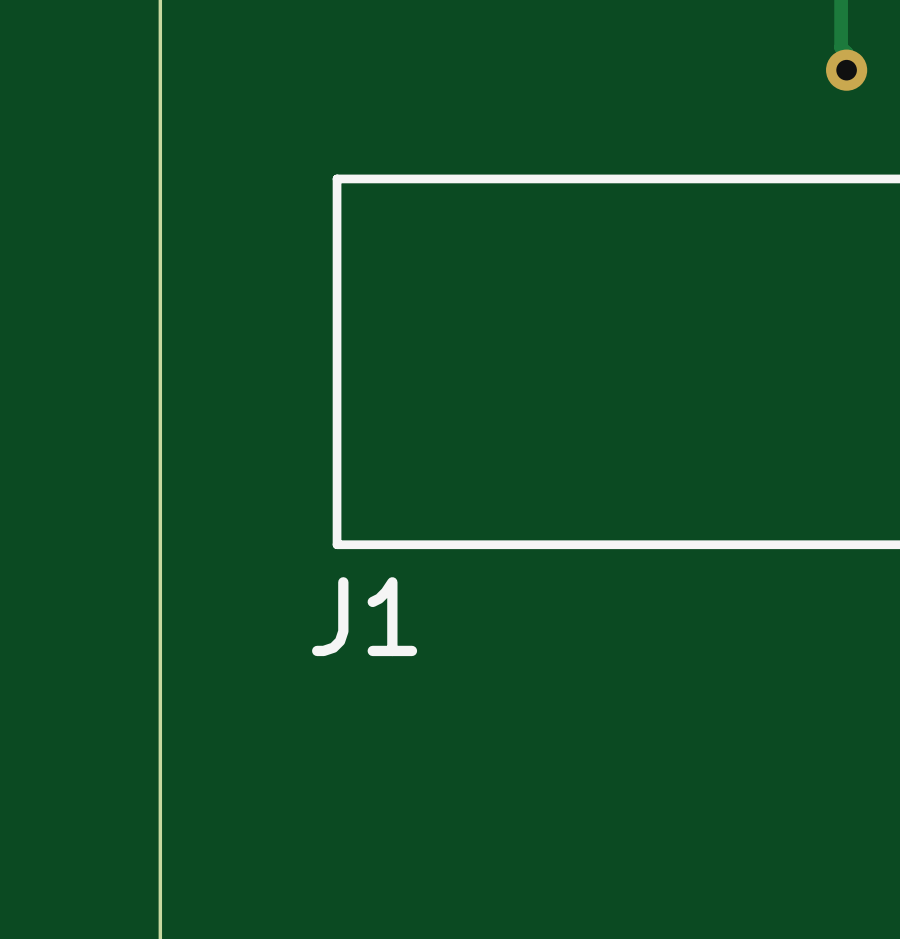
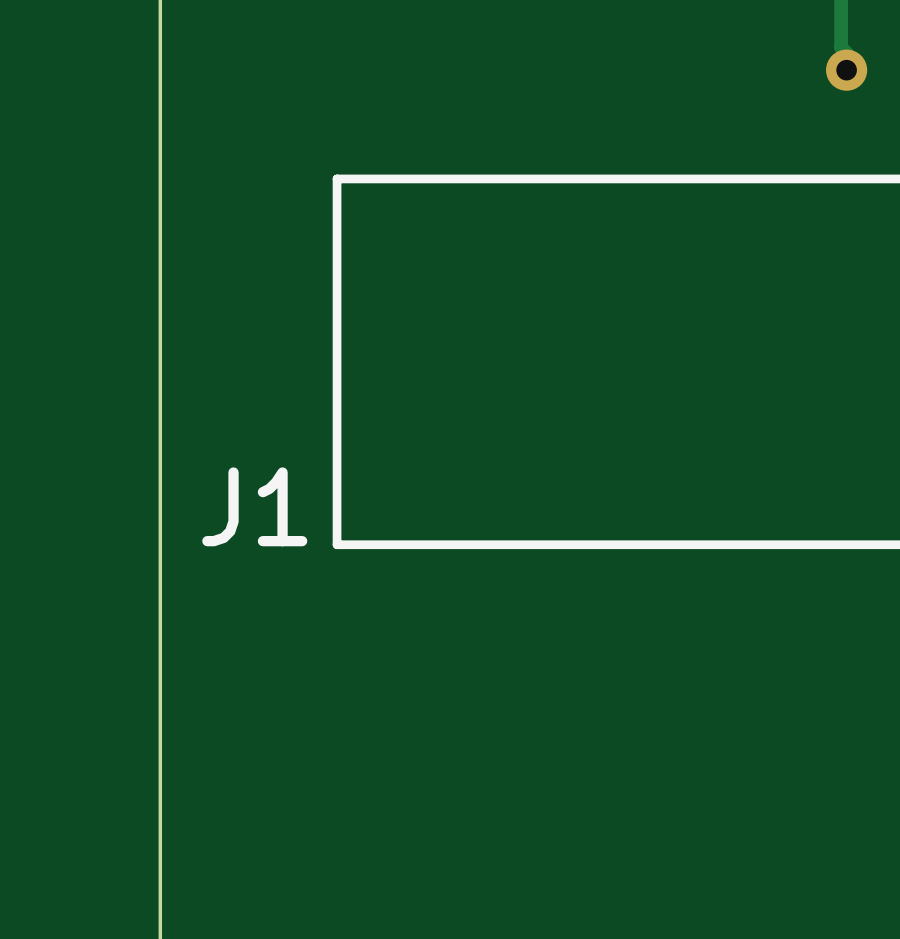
J1 name position: J1 (364, 616) -> J1 (254, 506)

